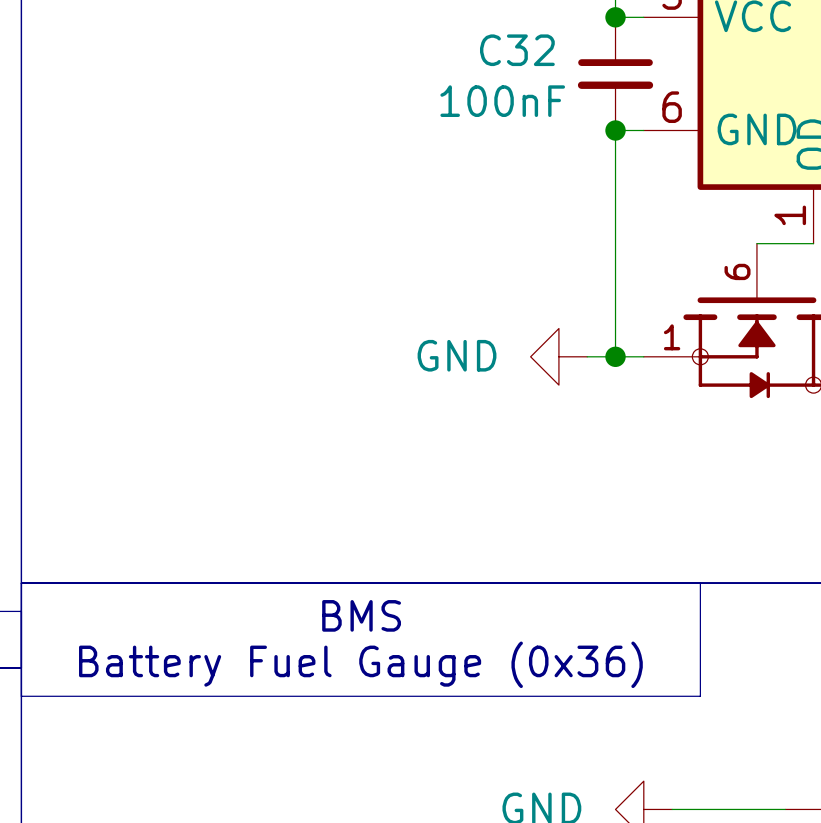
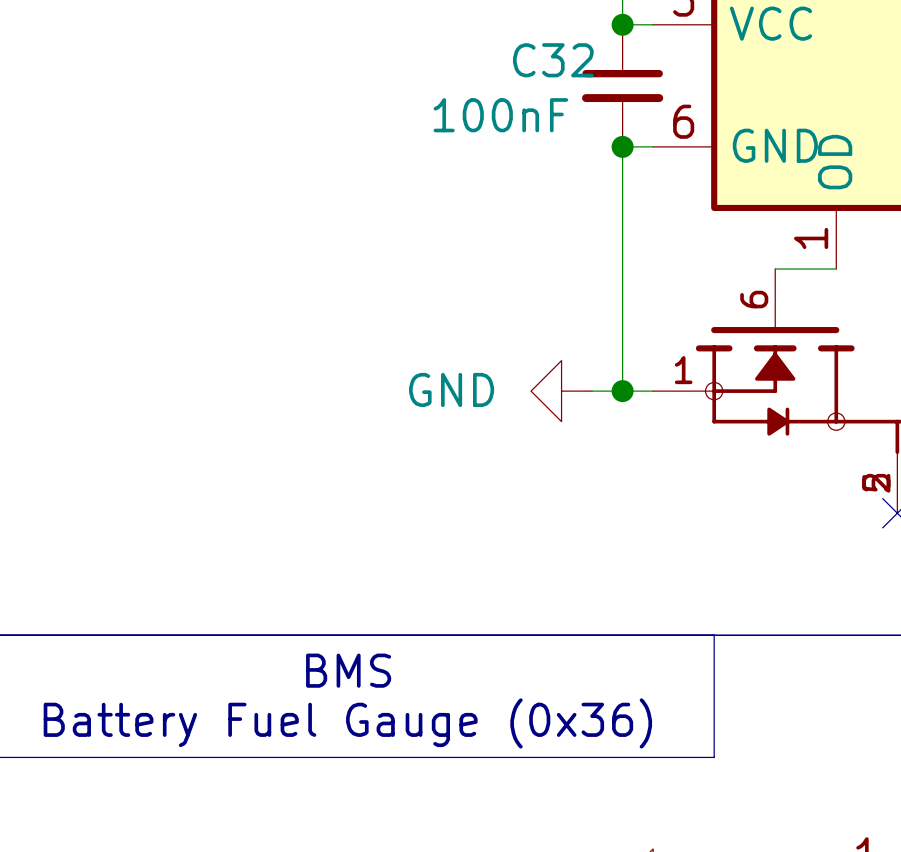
C32 name position: C32 (517, 50) -> C32 (553, 60)

